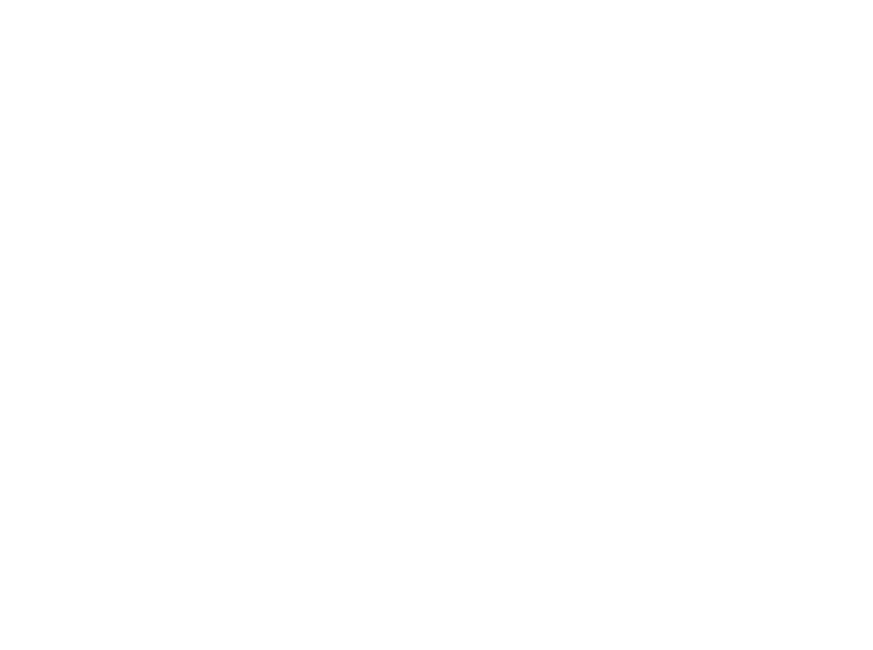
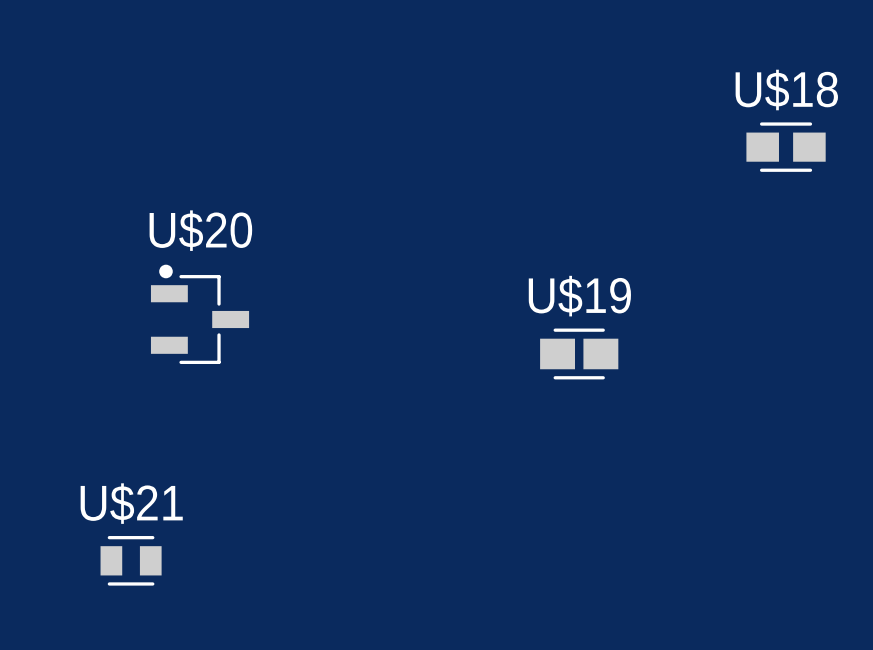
U$18: none -> (786, 147)
U$20: none -> (200, 314)
U$19: none -> (579, 353)
U$21: none -> (131, 560)

